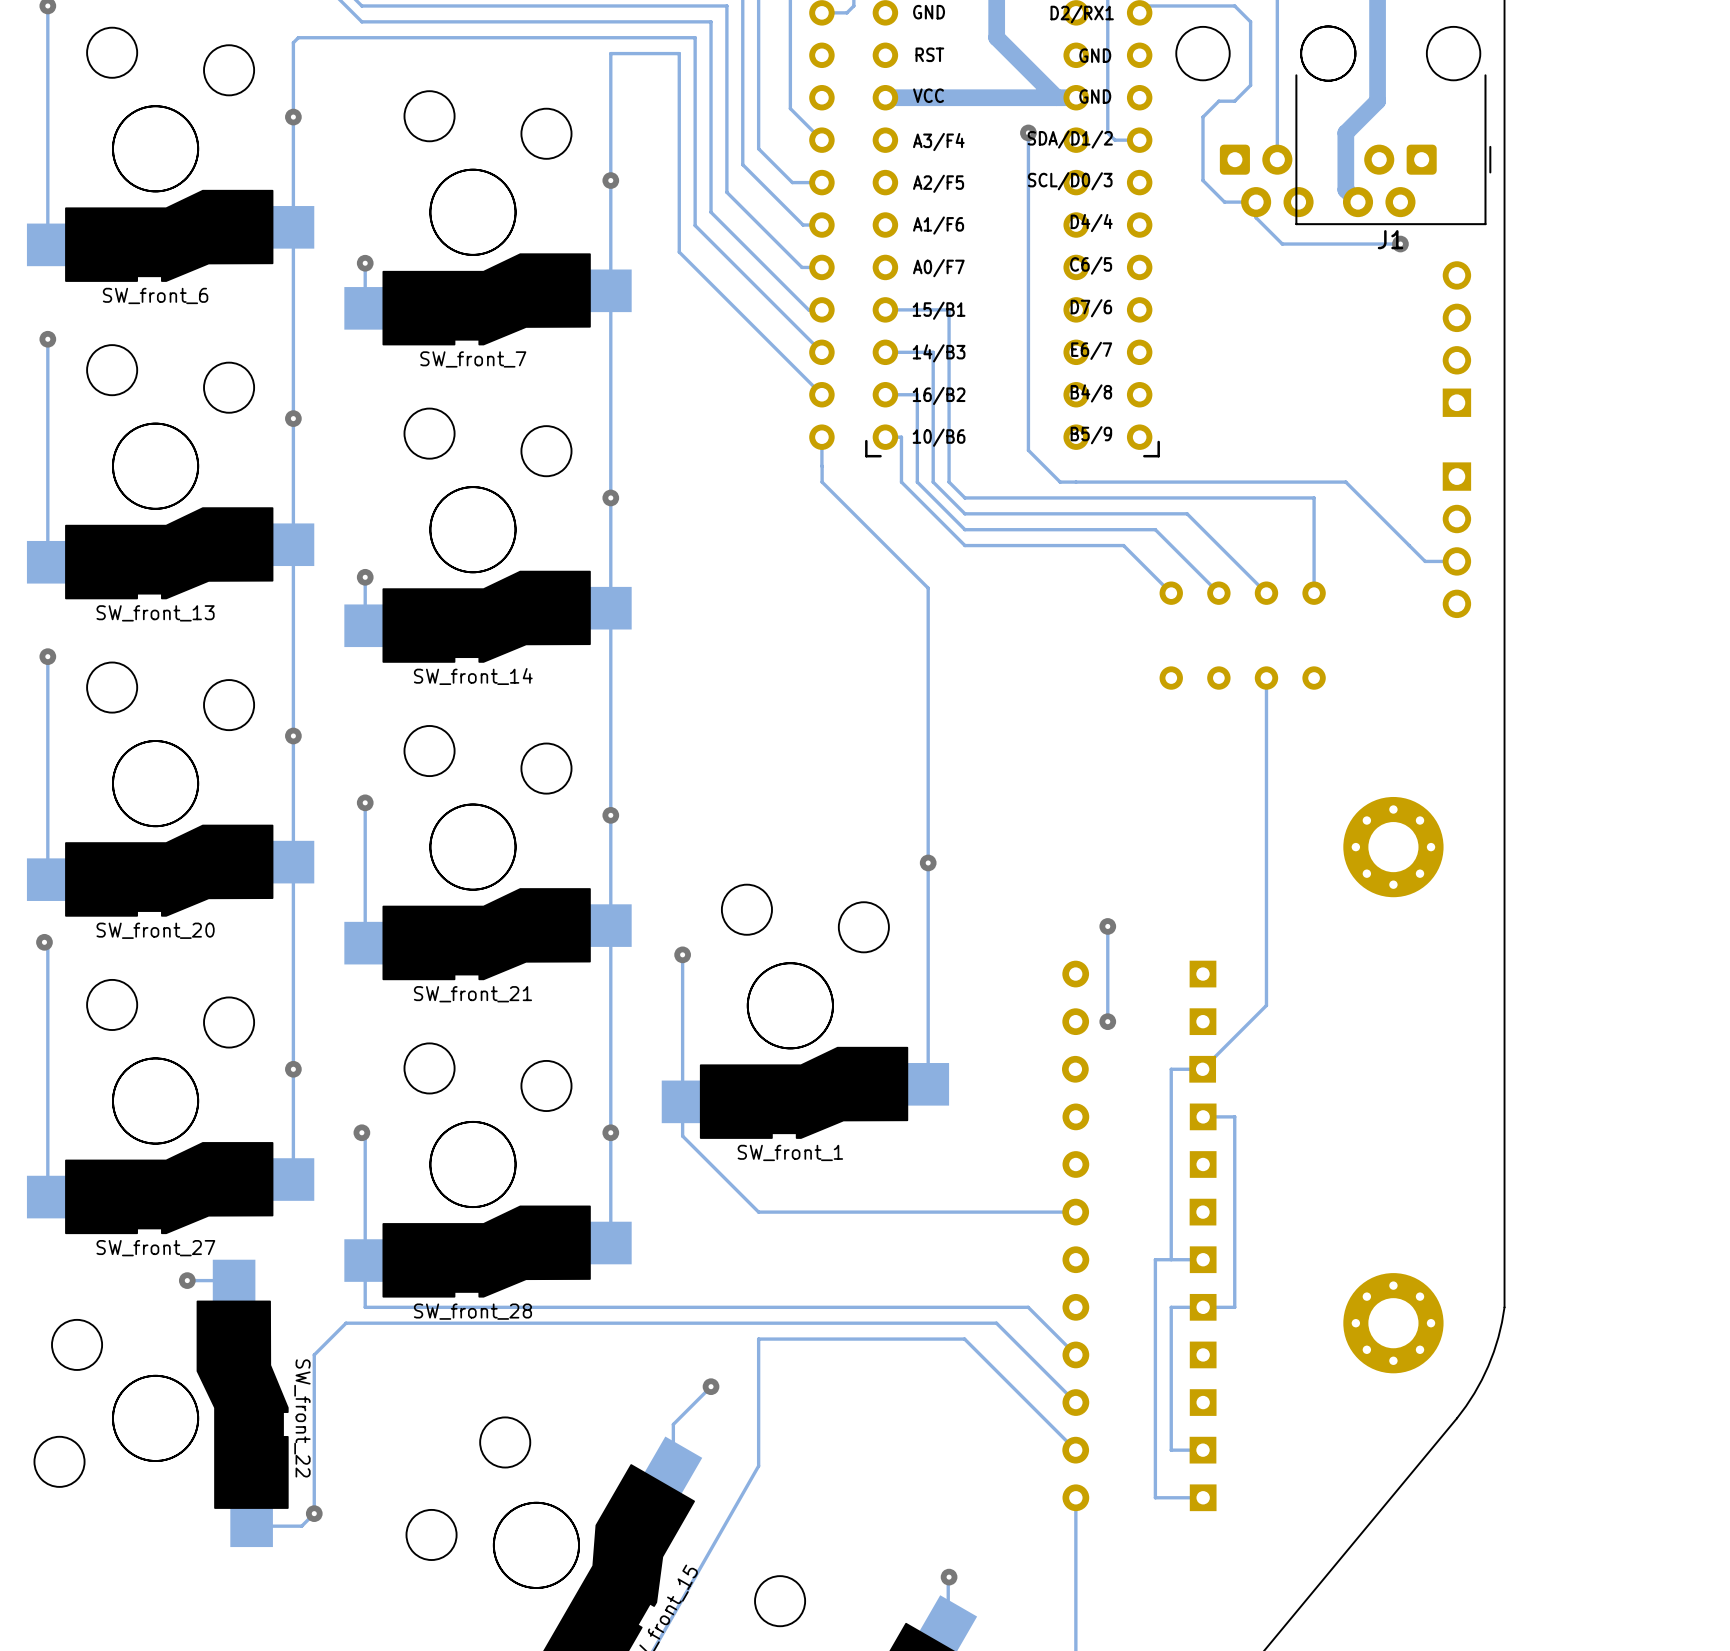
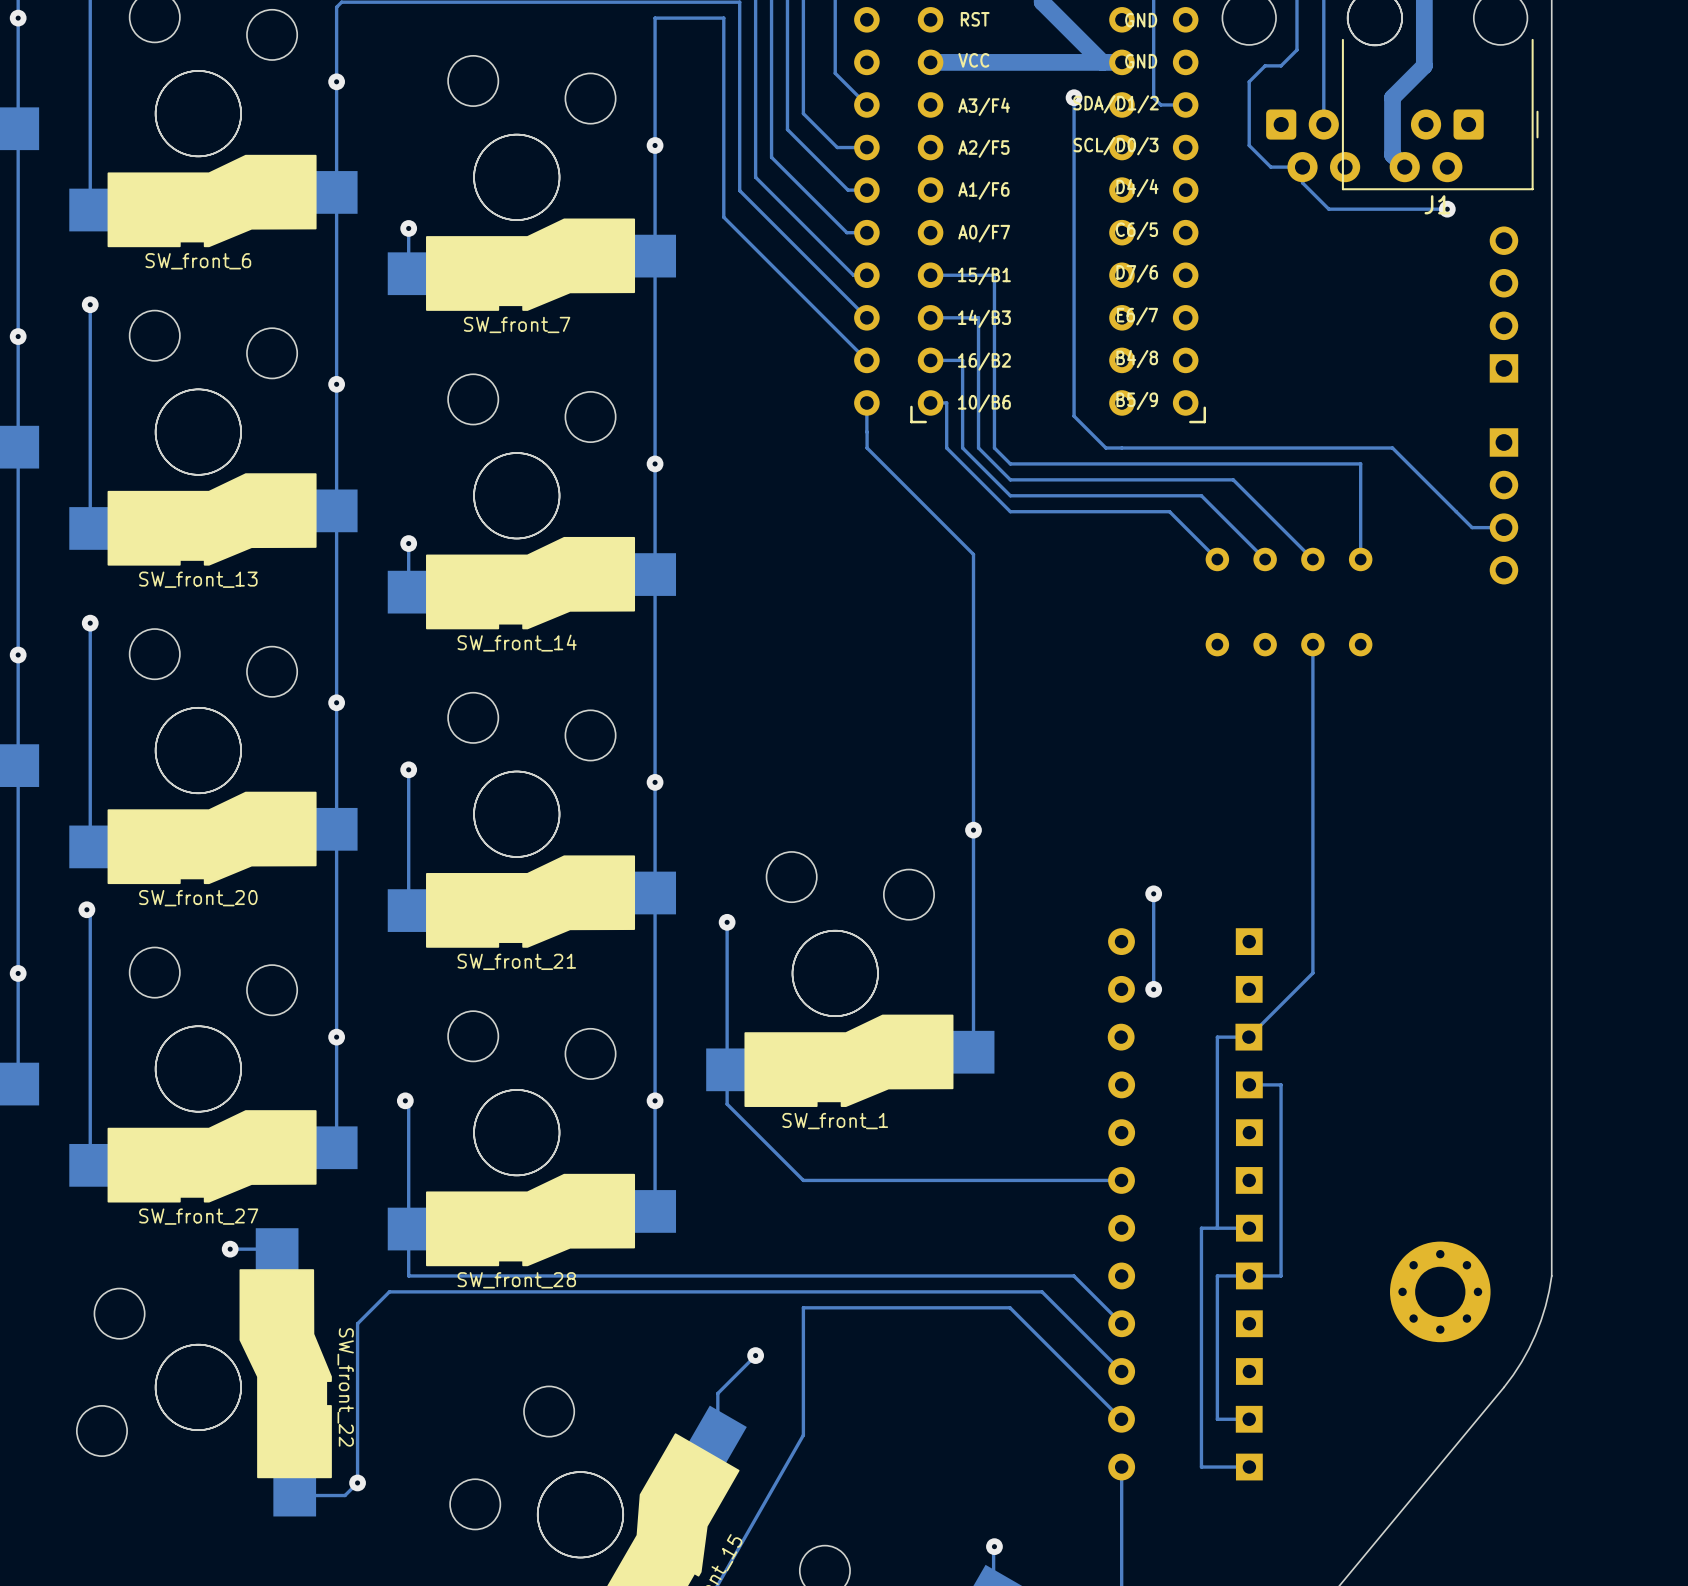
part: (1393, 847) -> none

